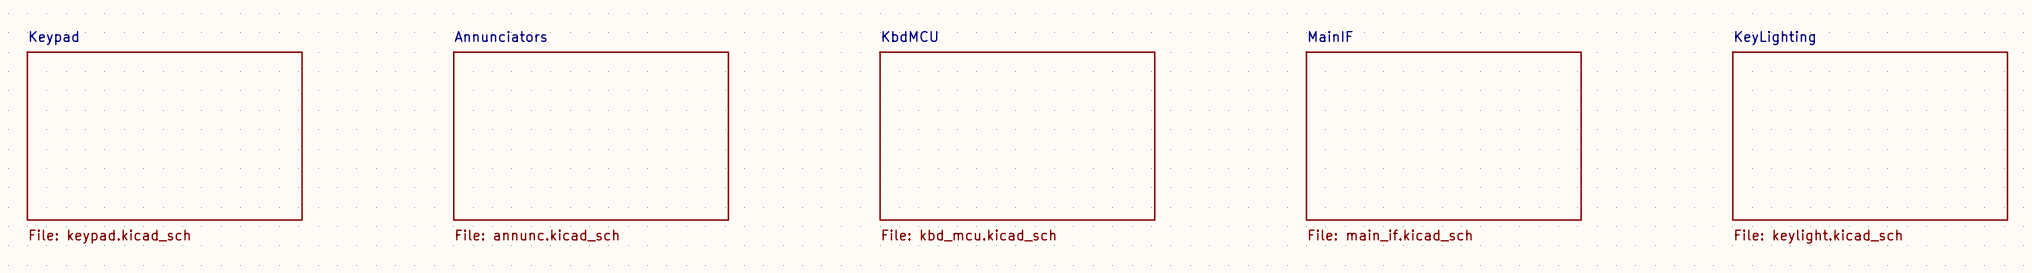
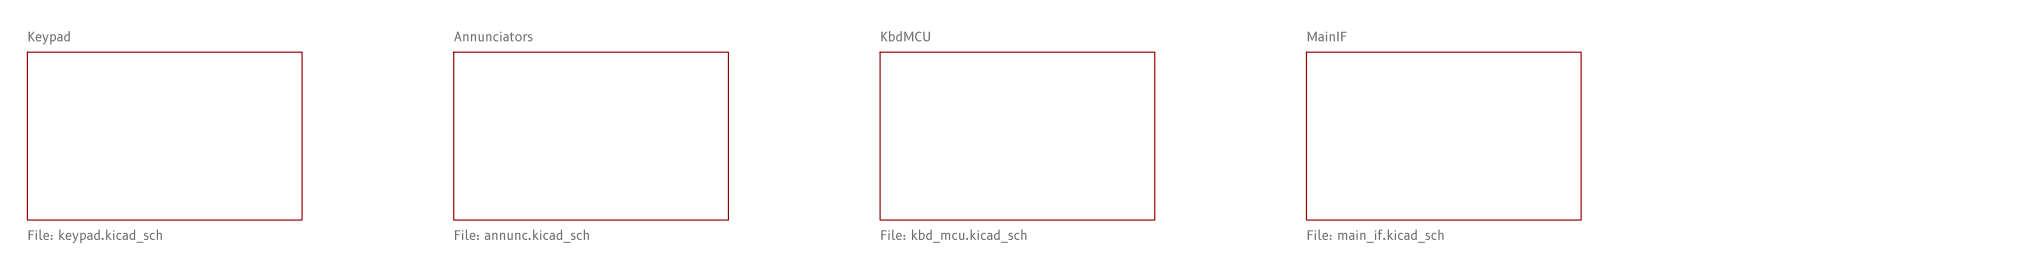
sheet KeyLighting: File: keylight.kicad_sch (1870, 136) -> none

